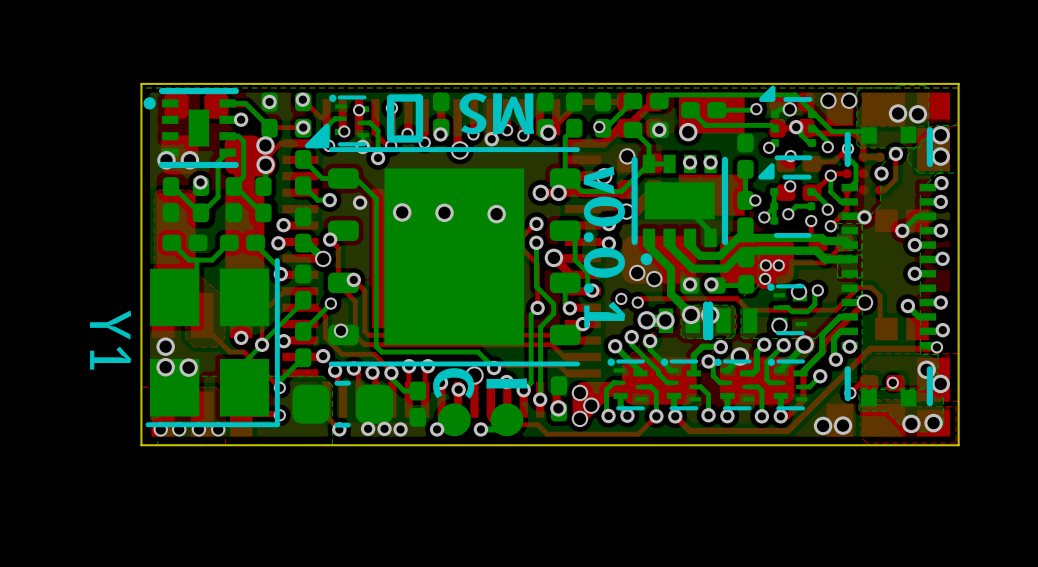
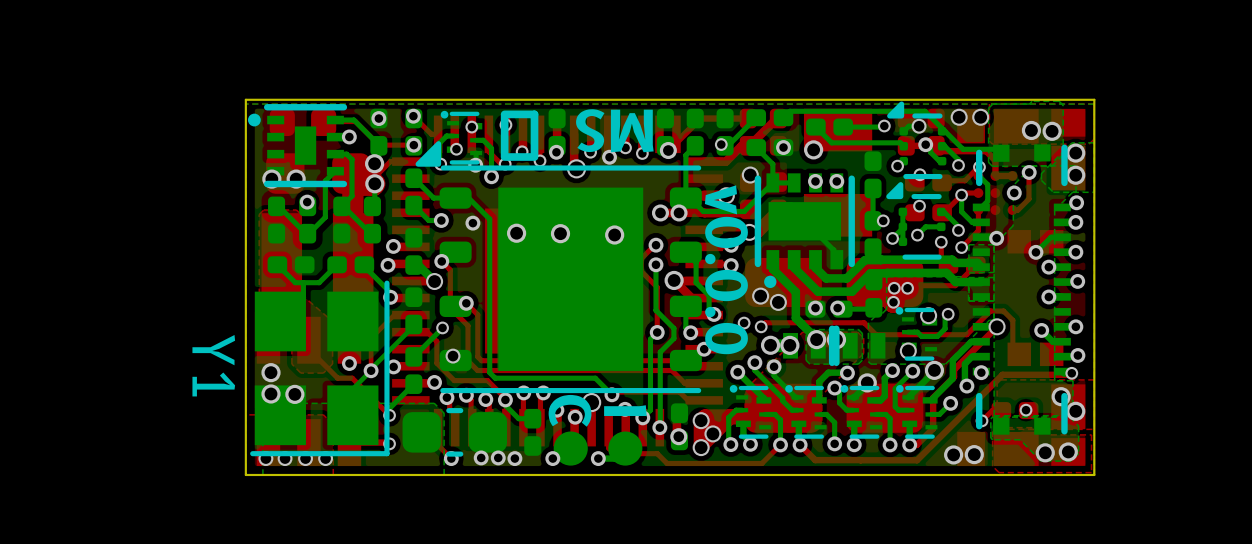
text: v0.0.1 (604, 246) -> v0.0.0 (726, 269)

